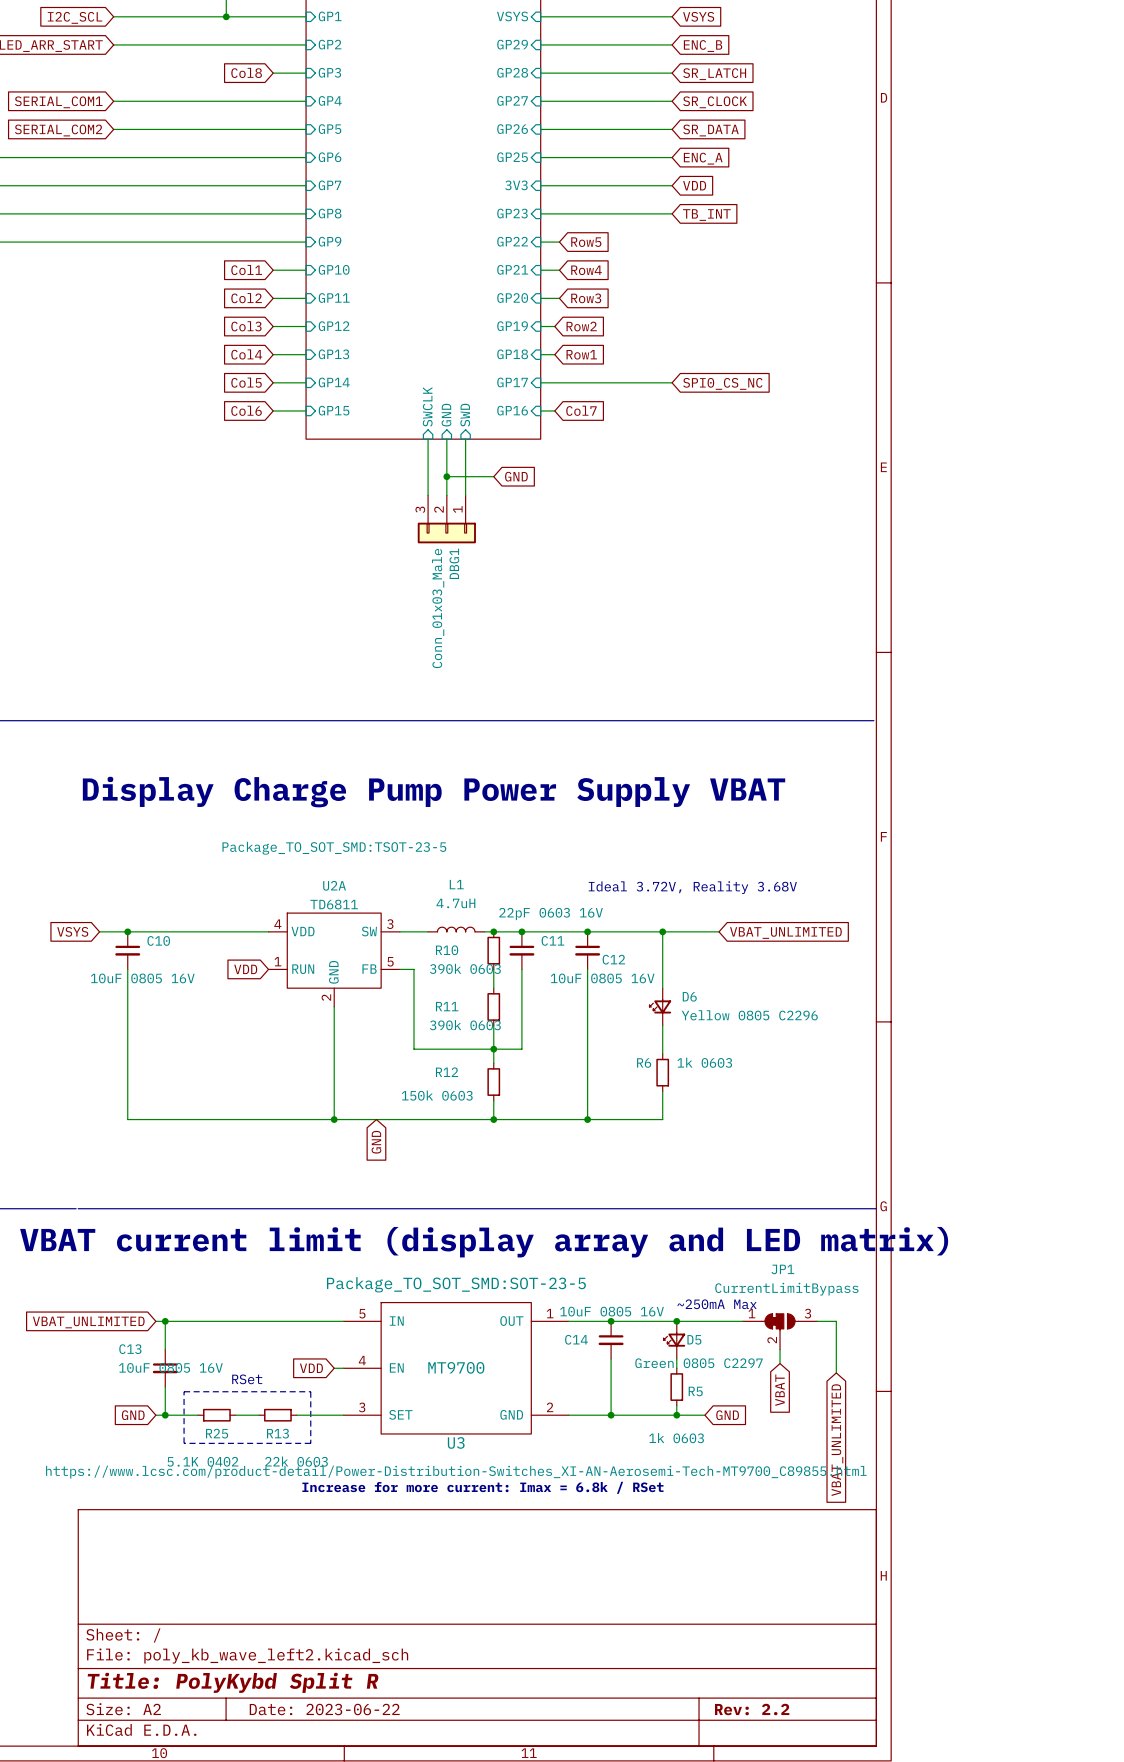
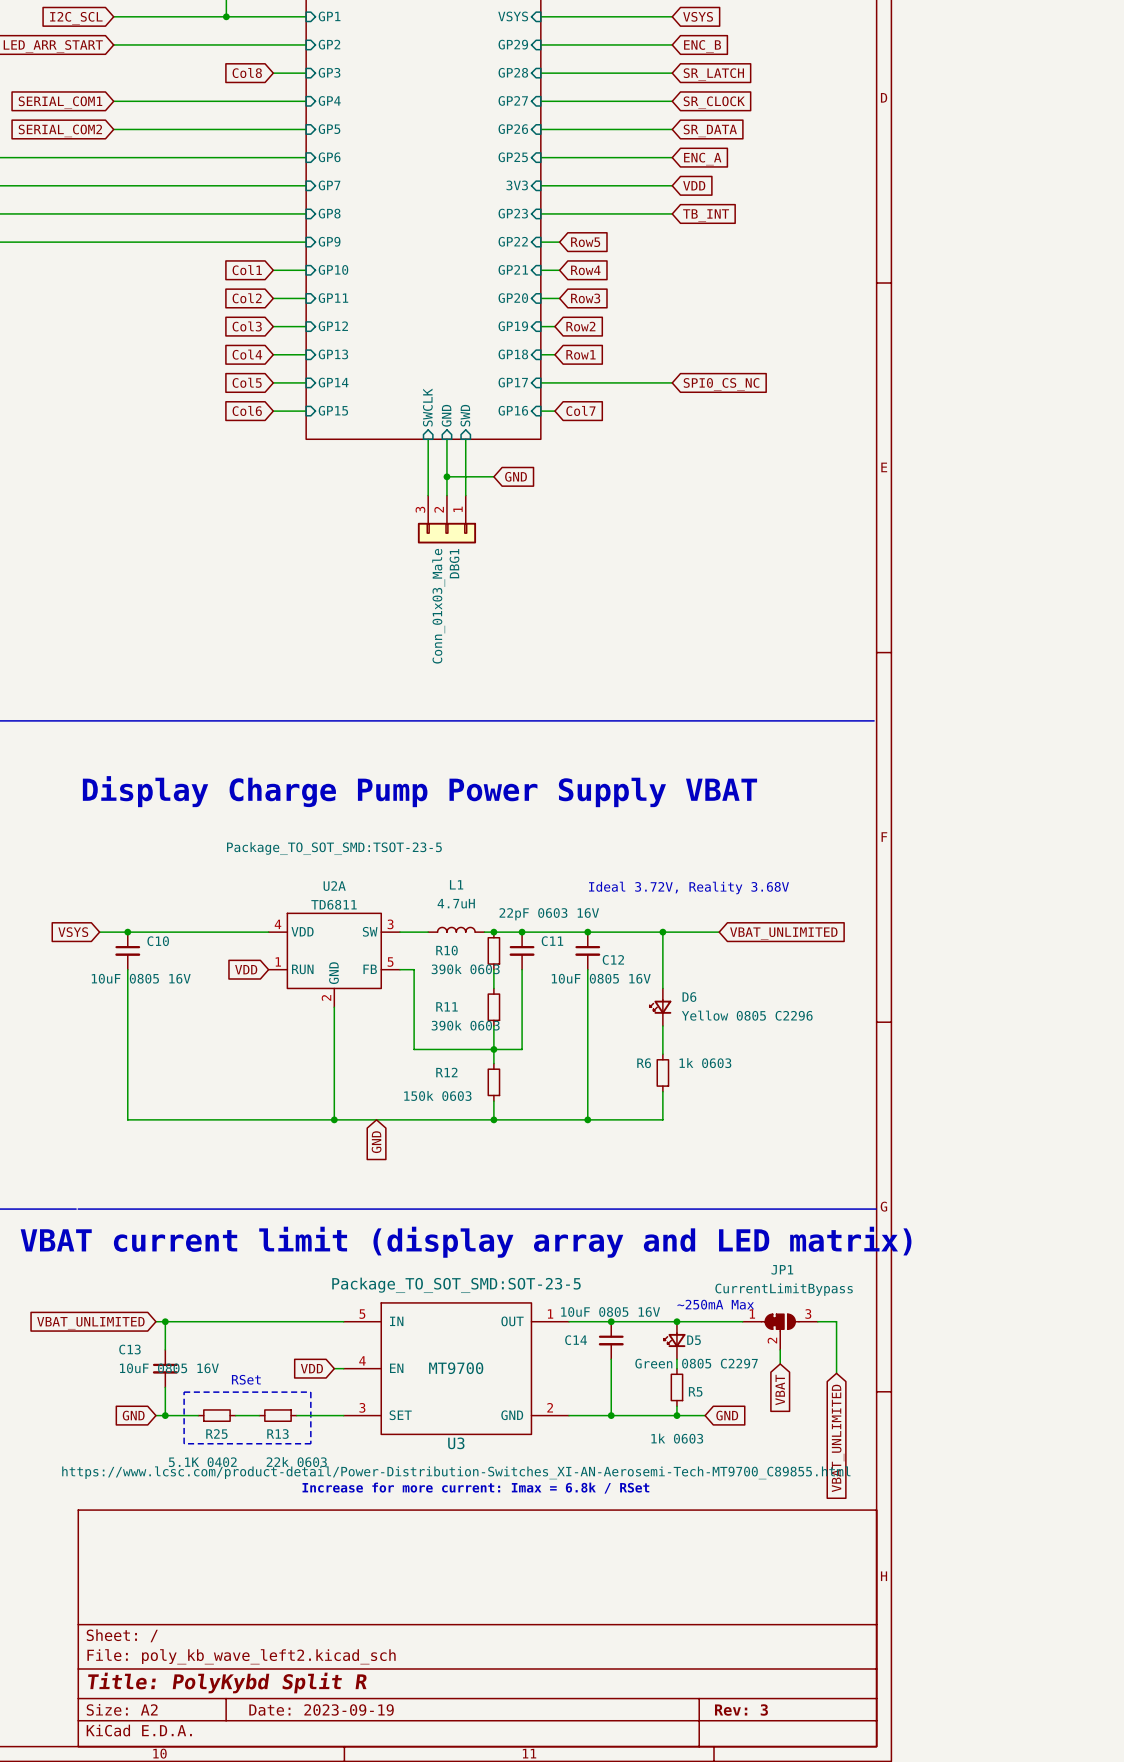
title block: Date: 2023-06-22 (324, 1709) -> Date: 2023-09-19 (321, 1709)
title block: Rev: 2.2 (752, 1709) -> Rev: 3 (741, 1709)

